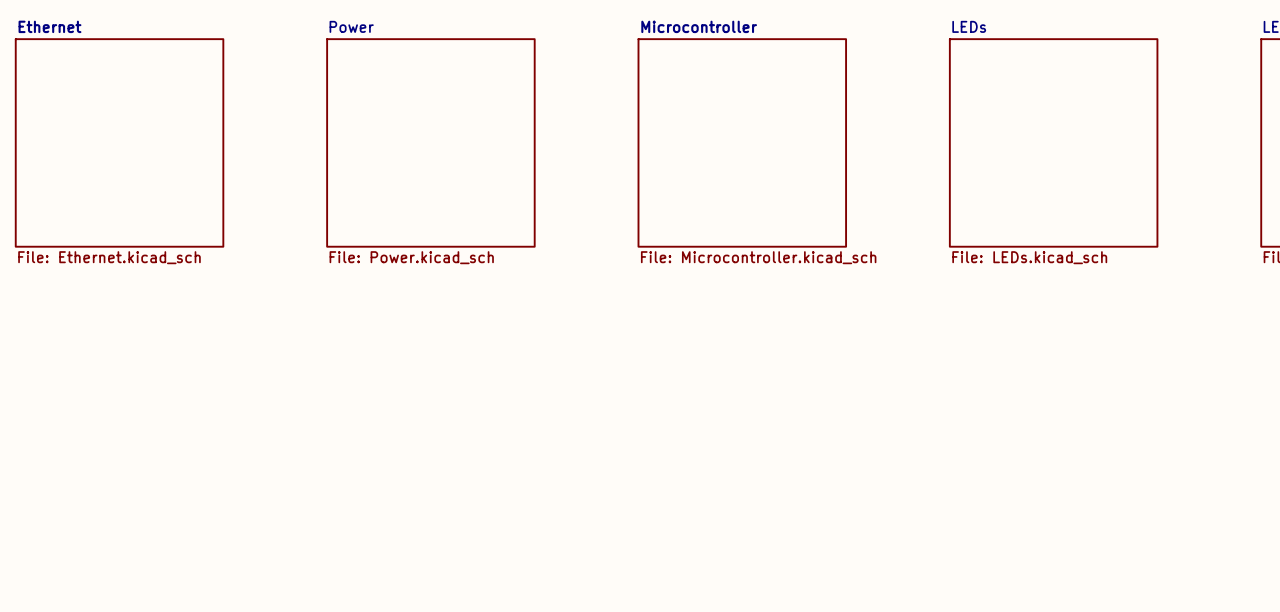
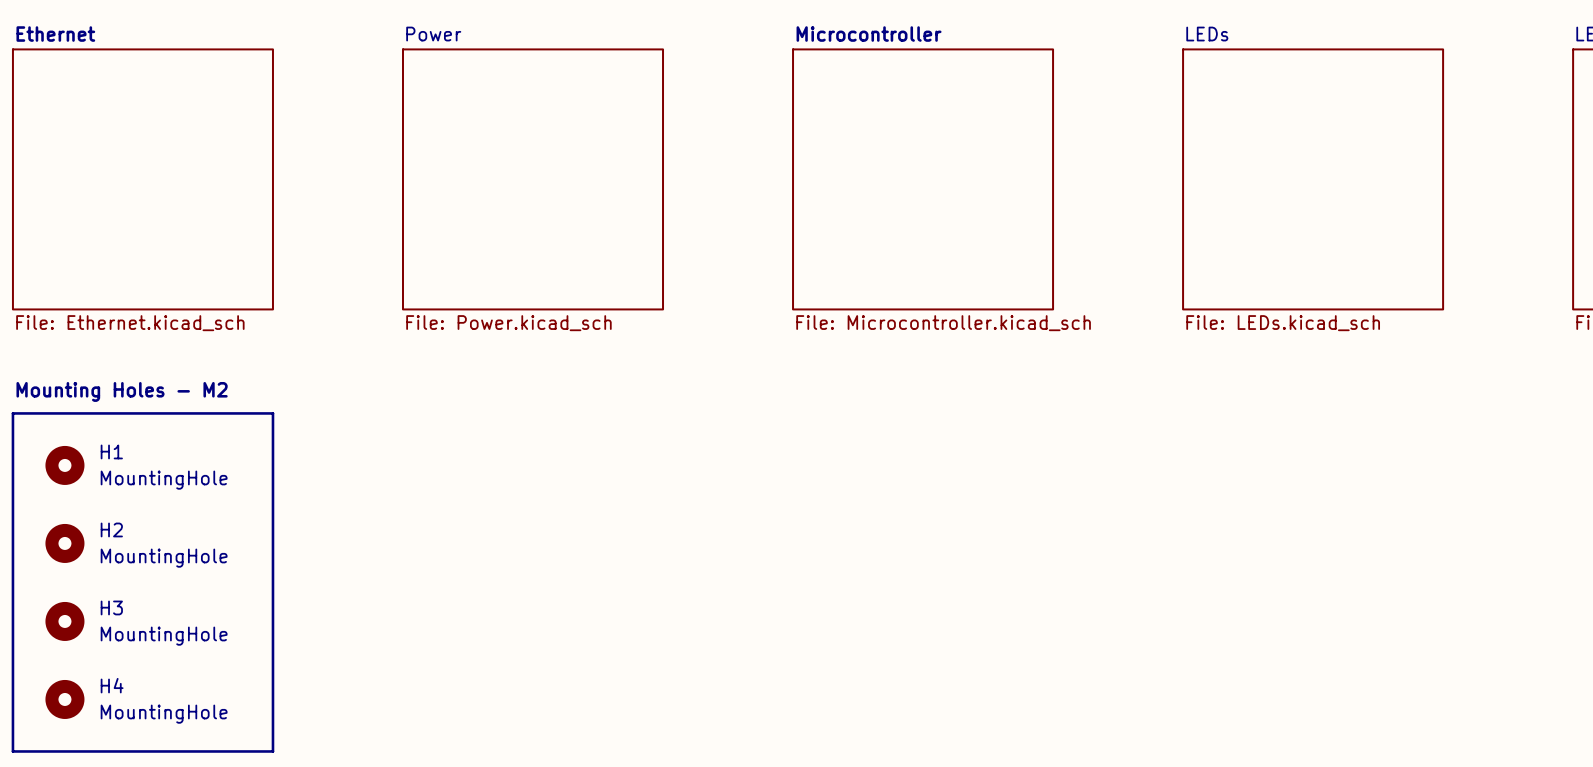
text: none -> Mounting Holes - M2 (122, 391)
line: none -> (12, 413) (272, 413) (272, 751) (12, 751) (12, 413)
H1: none -> MountingHole (64, 465)
H2: none -> MountingHole (64, 543)
H3: none -> MountingHole (64, 621)
H4: none -> MountingHole (64, 699)

